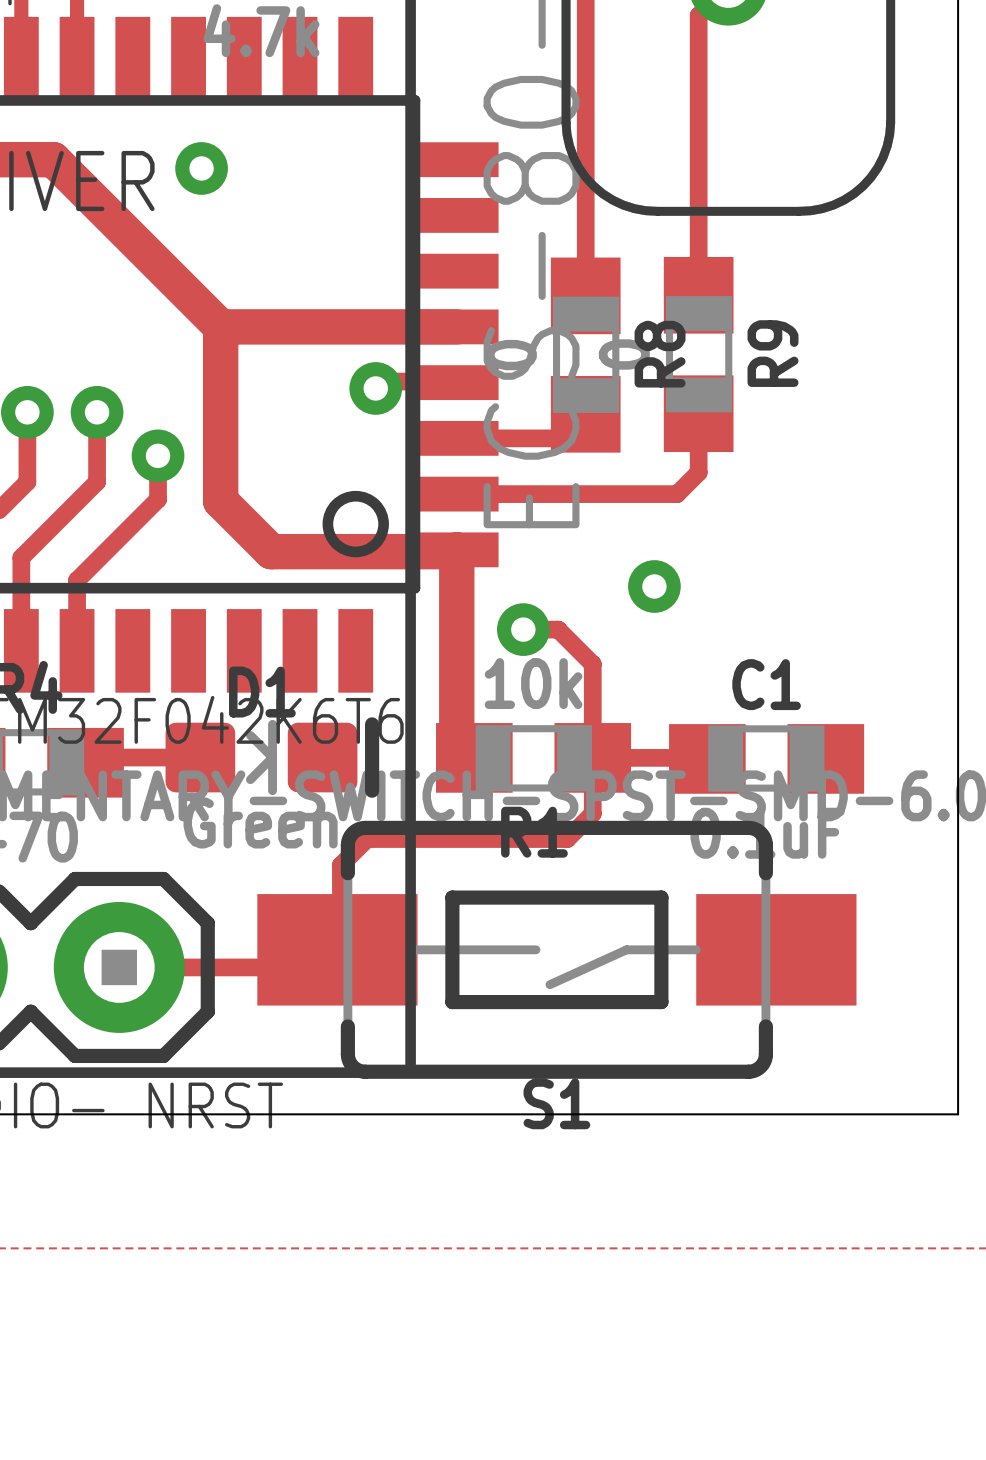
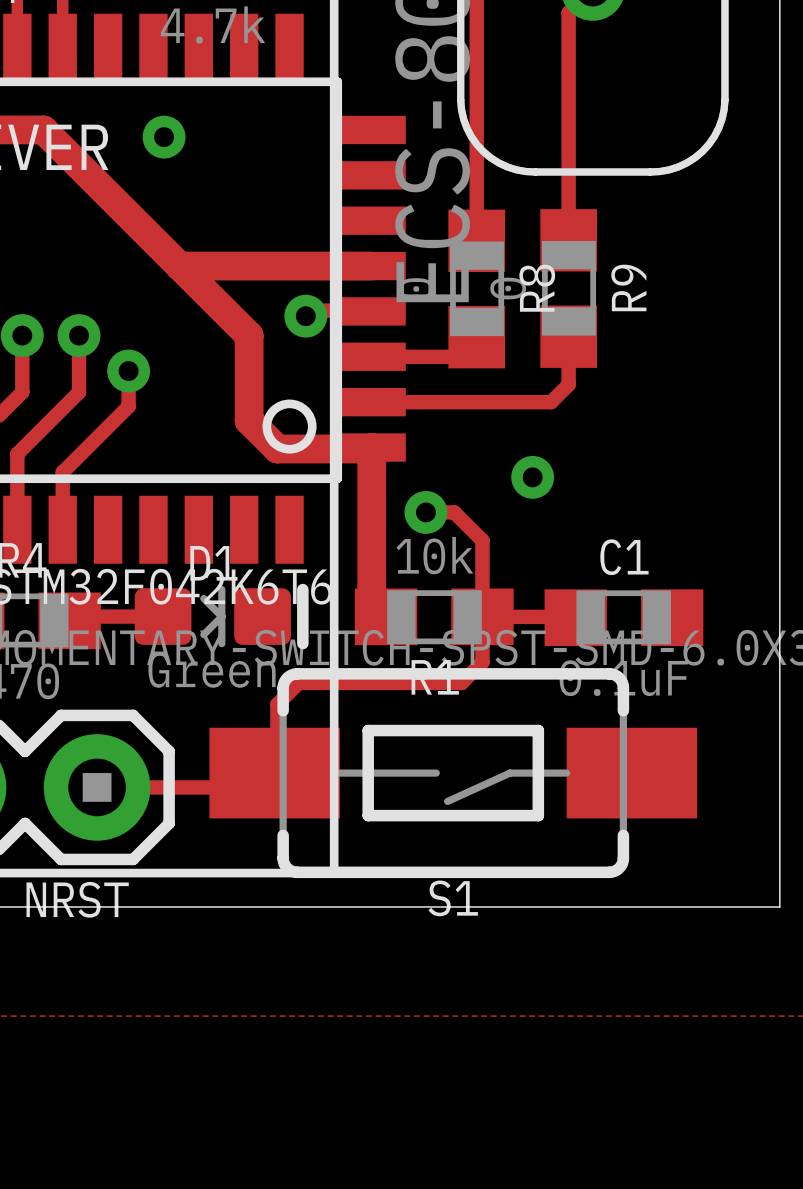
track: (220, 326) (220, 501) (271, 551) (340, 551) -> (179, 266) (249, 335) (249, 420) (277, 449)

